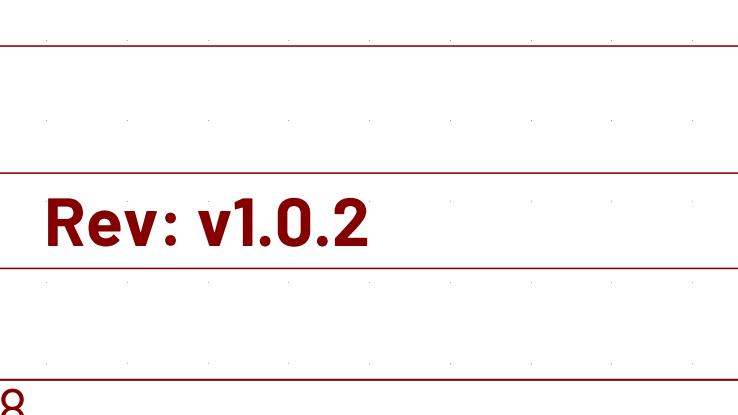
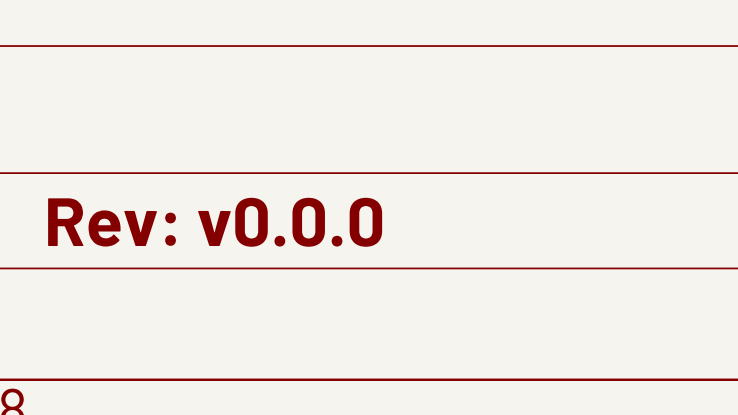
title block: Rev: v1.0.2 (207, 222) -> Rev: v0.0.0 (215, 222)

